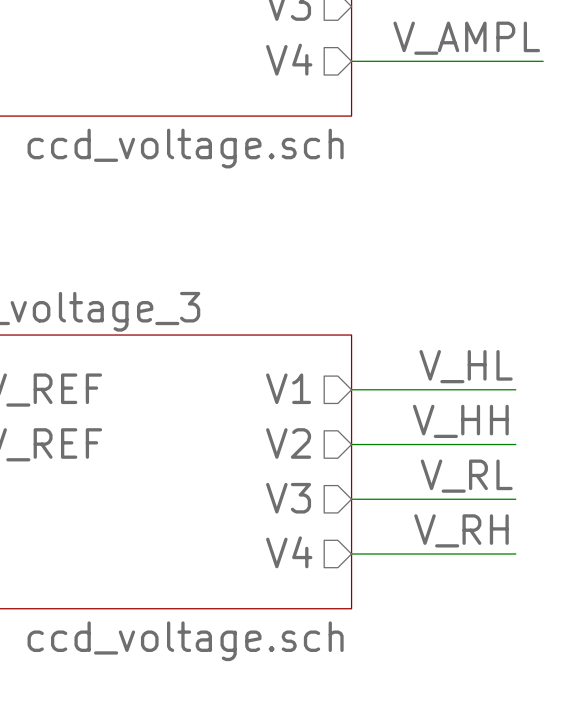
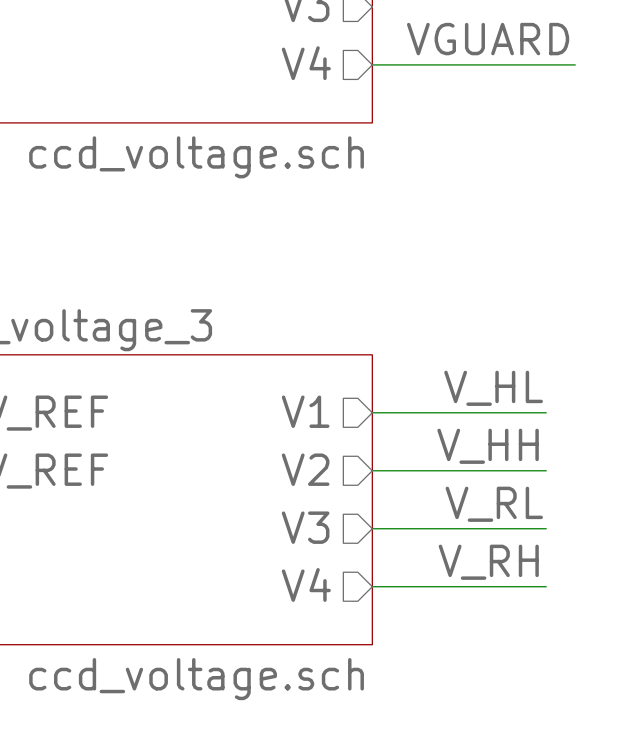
label: V_AMPL (466, 38) -> VGUARD (488, 39)

